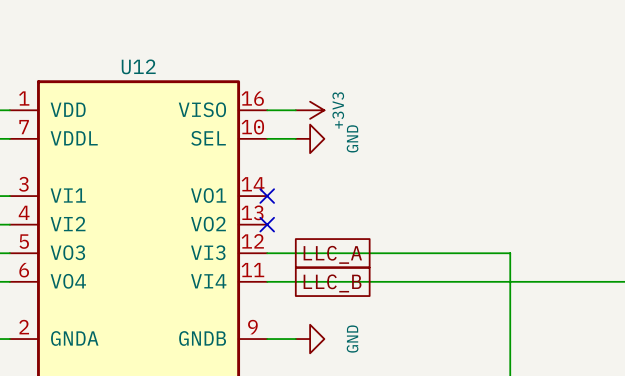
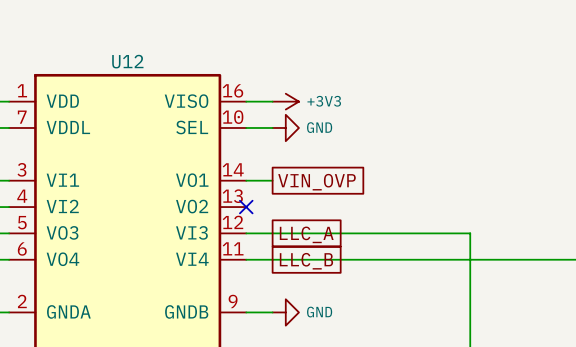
power symbol text rotation: 0° (338, 110) -> 90° clockwise (324, 101)
power symbol text rotation: 0° (352, 138) -> 90° clockwise (319, 127)
wire: none -> (246, 180) (272, 180)
no-connect mark: (267, 196) -> none
global label: none -> VIN_OVP (316, 182)
power symbol text rotation: 0° (352, 339) -> 90° clockwise (319, 312)

